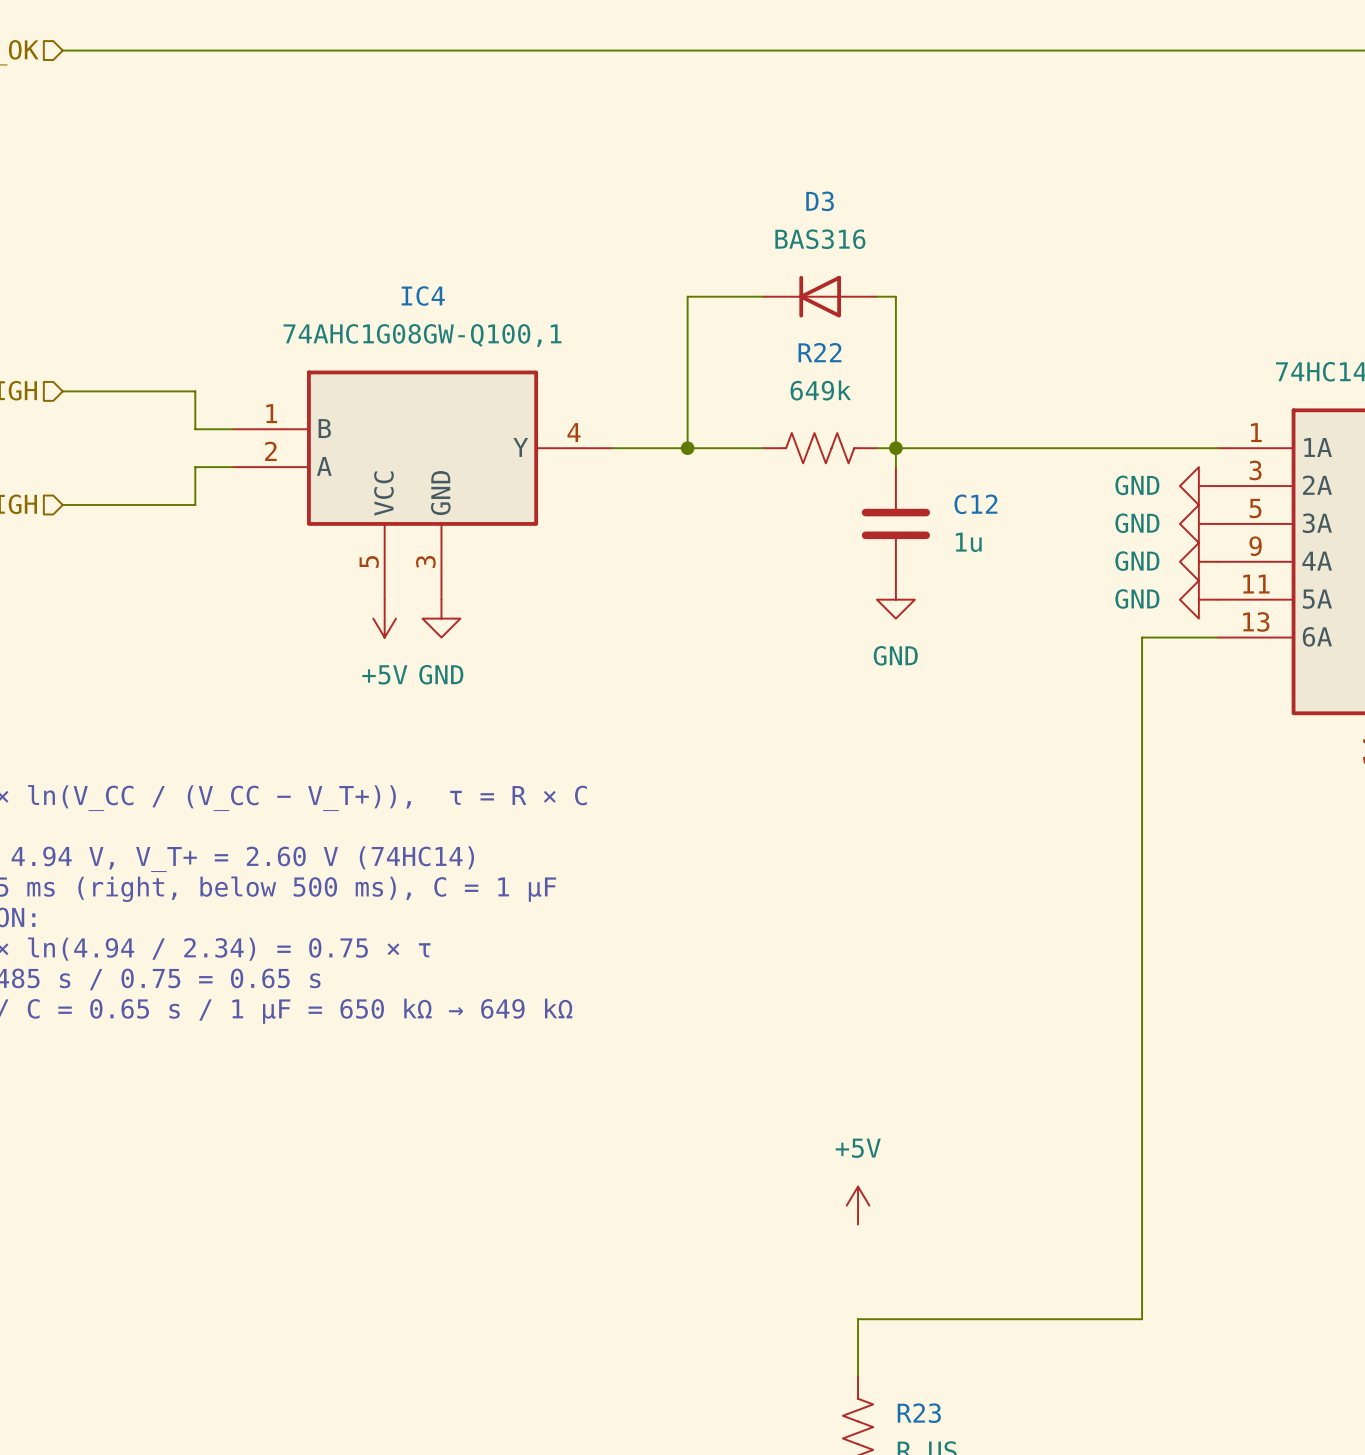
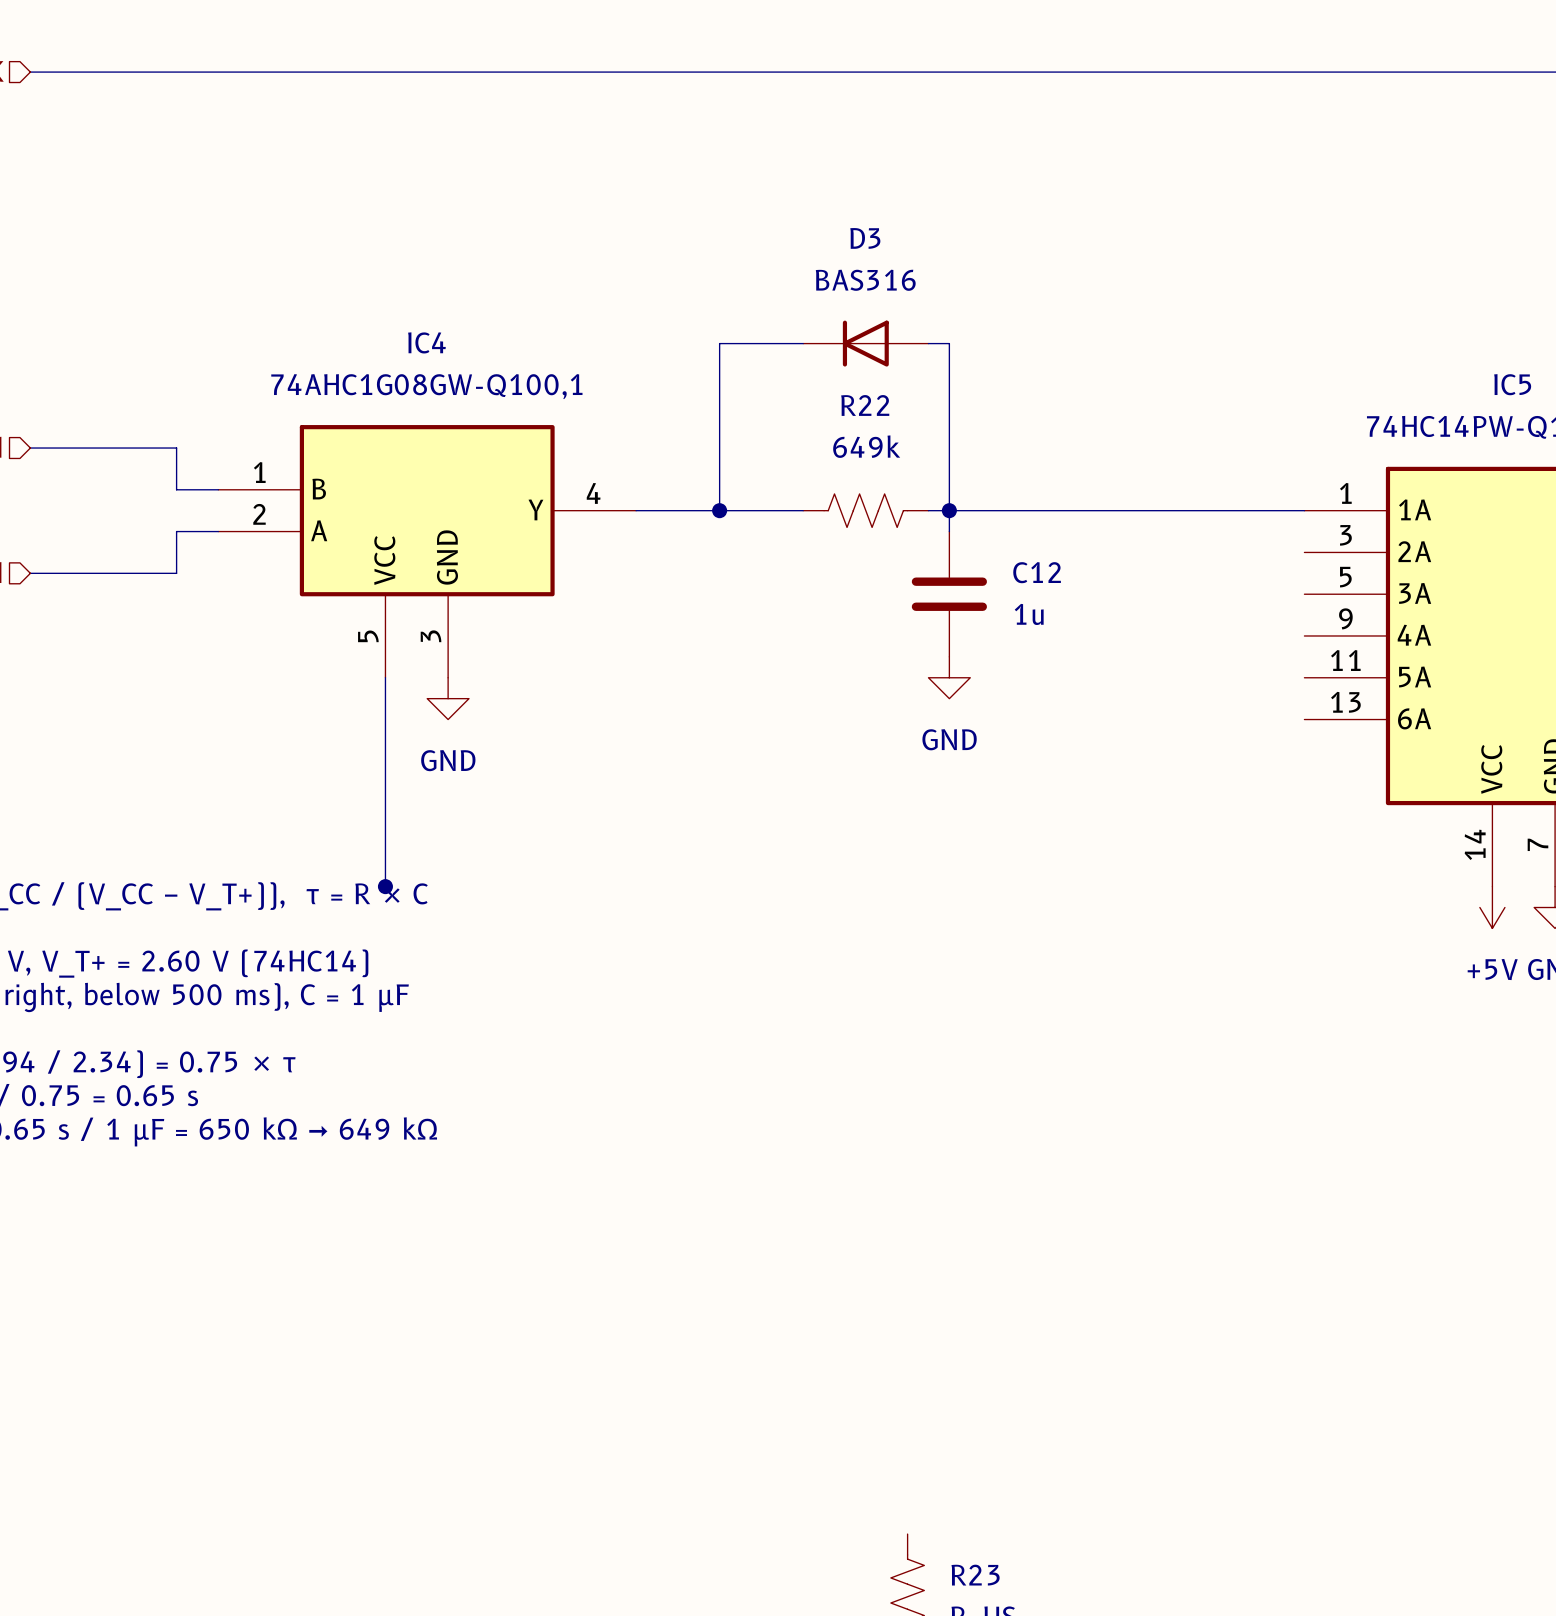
power symbol: GND (1198, 486) -> none
power symbol: GND (1198, 523) -> none
power symbol: GND (1198, 561) -> none
wire: none -> (385, 677) (385, 886)
power symbol: GND (1198, 599) -> none
power symbol: +5V (384, 618) -> none
wire: (1217, 637) (1142, 637) (1142, 1319) (858, 1319) (858, 1376) -> none
junction: none -> (385, 886)
power symbol: +5V (858, 1205) -> none

